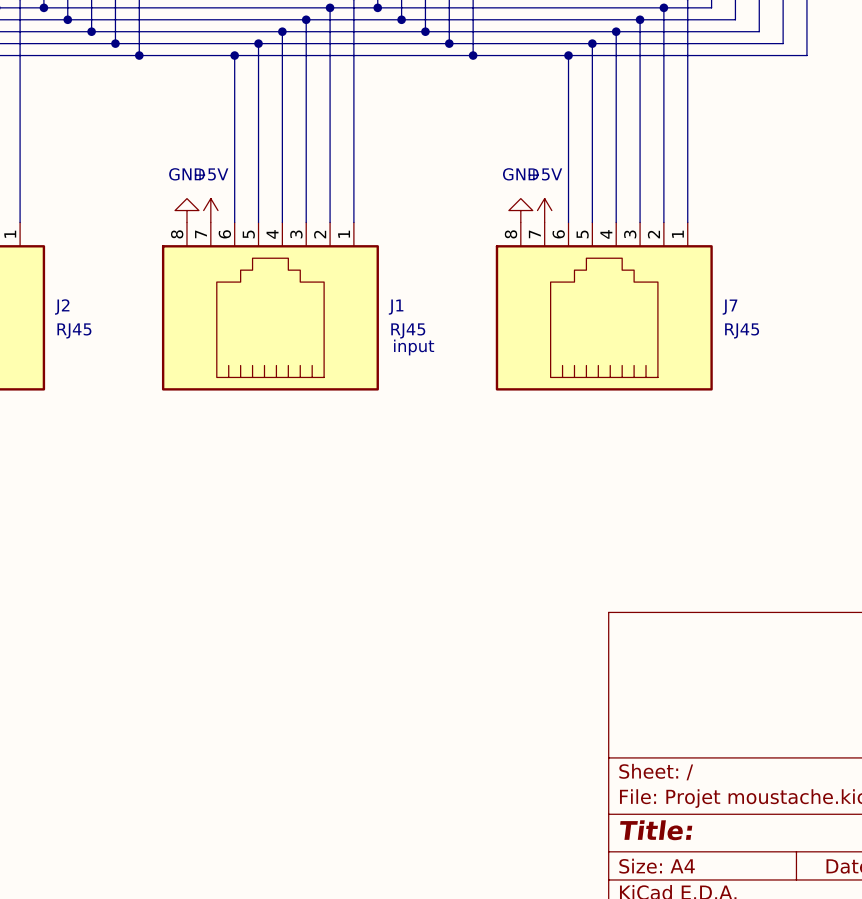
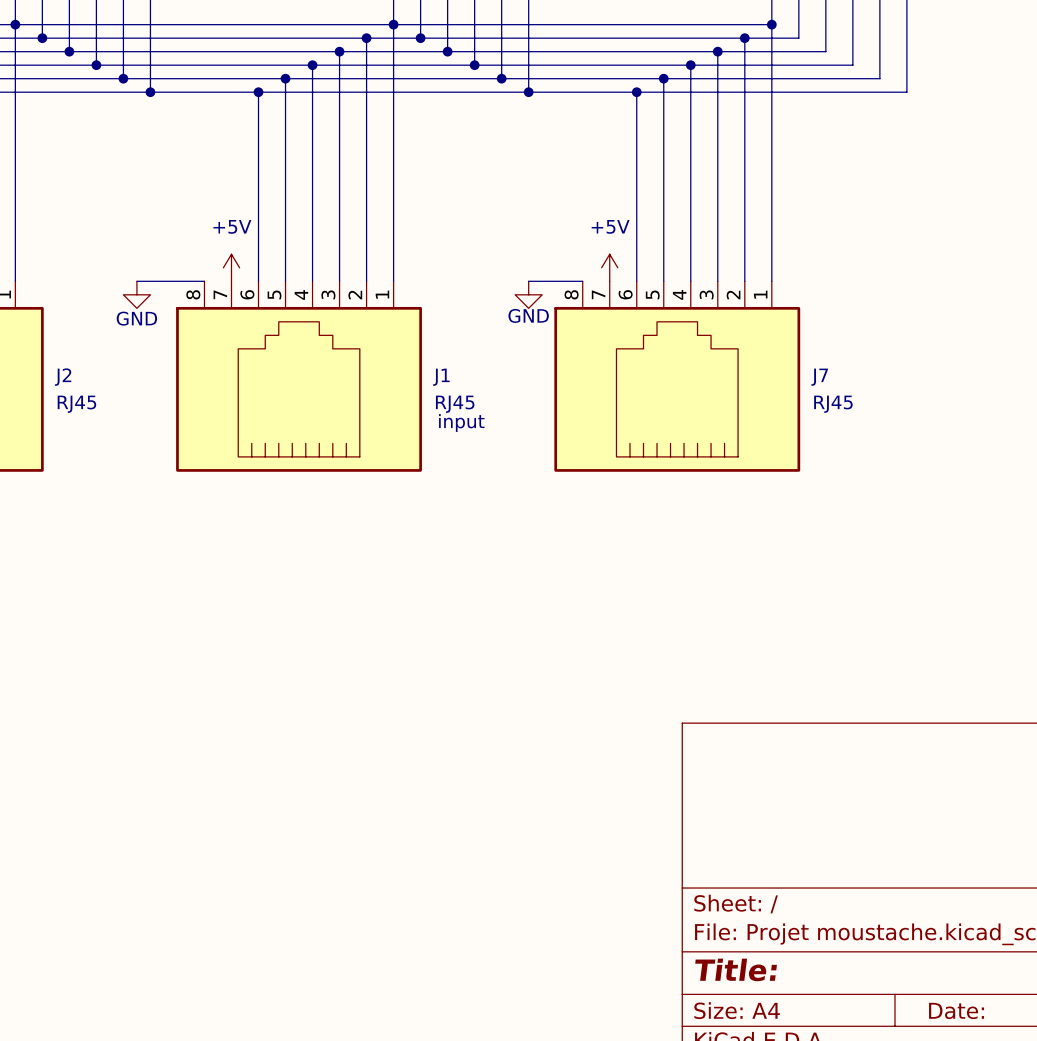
power symbol rotation: 0° (186, 210) -> 180° (136, 294)
power symbol position: GND (186, 210) -> GND (136, 294)
power symbol rotation: 0° (520, 210) -> 180° (528, 294)
power symbol position: GND (520, 210) -> GND (528, 294)
wire: none -> (136, 281) (204, 281)
wire: none -> (528, 281) (582, 281)

